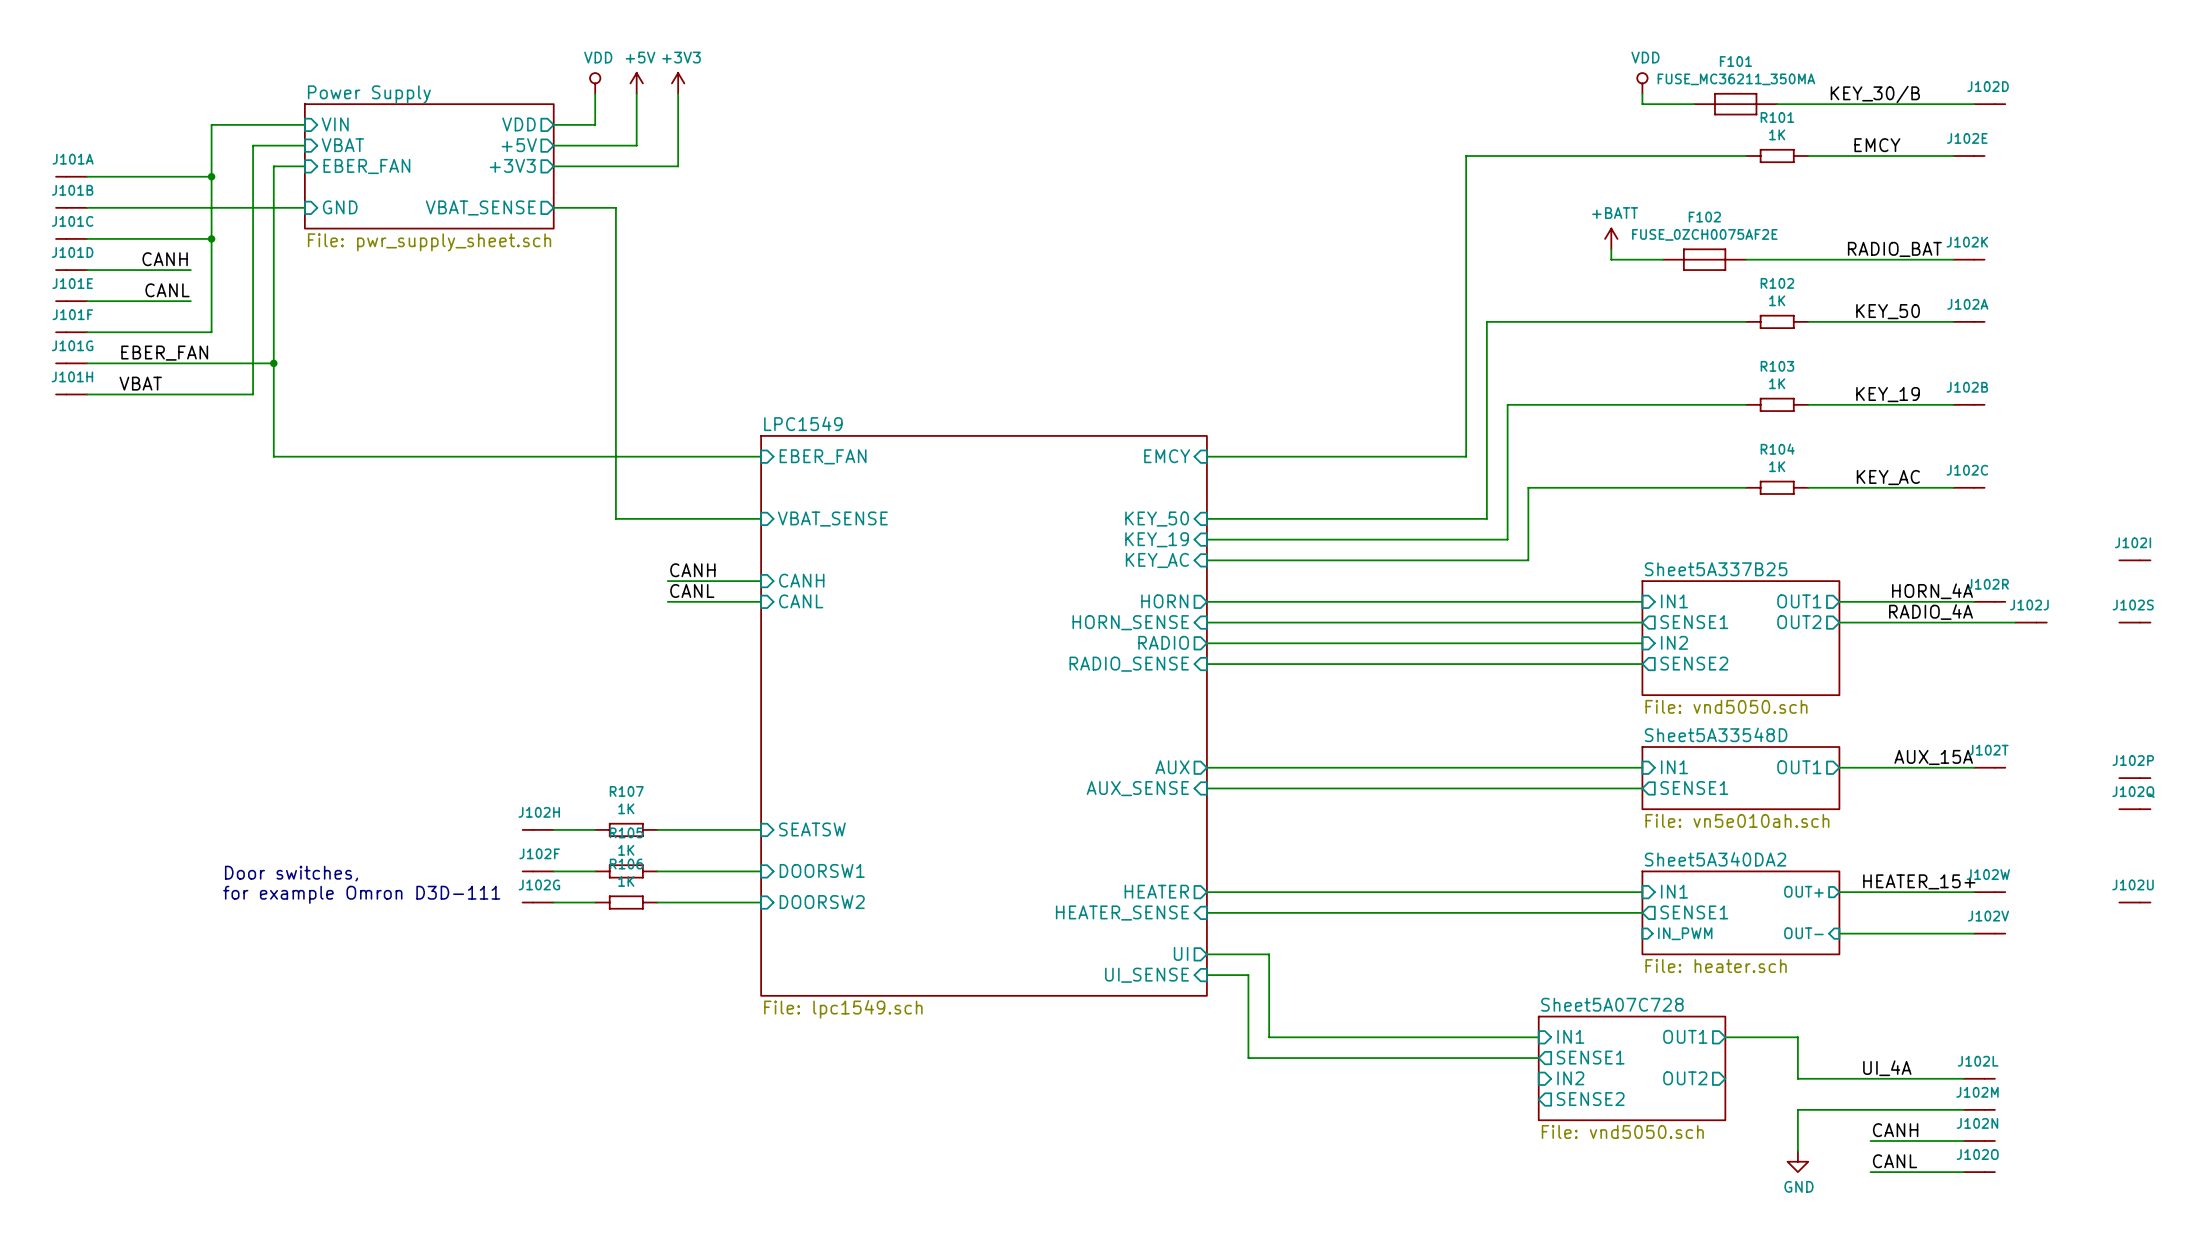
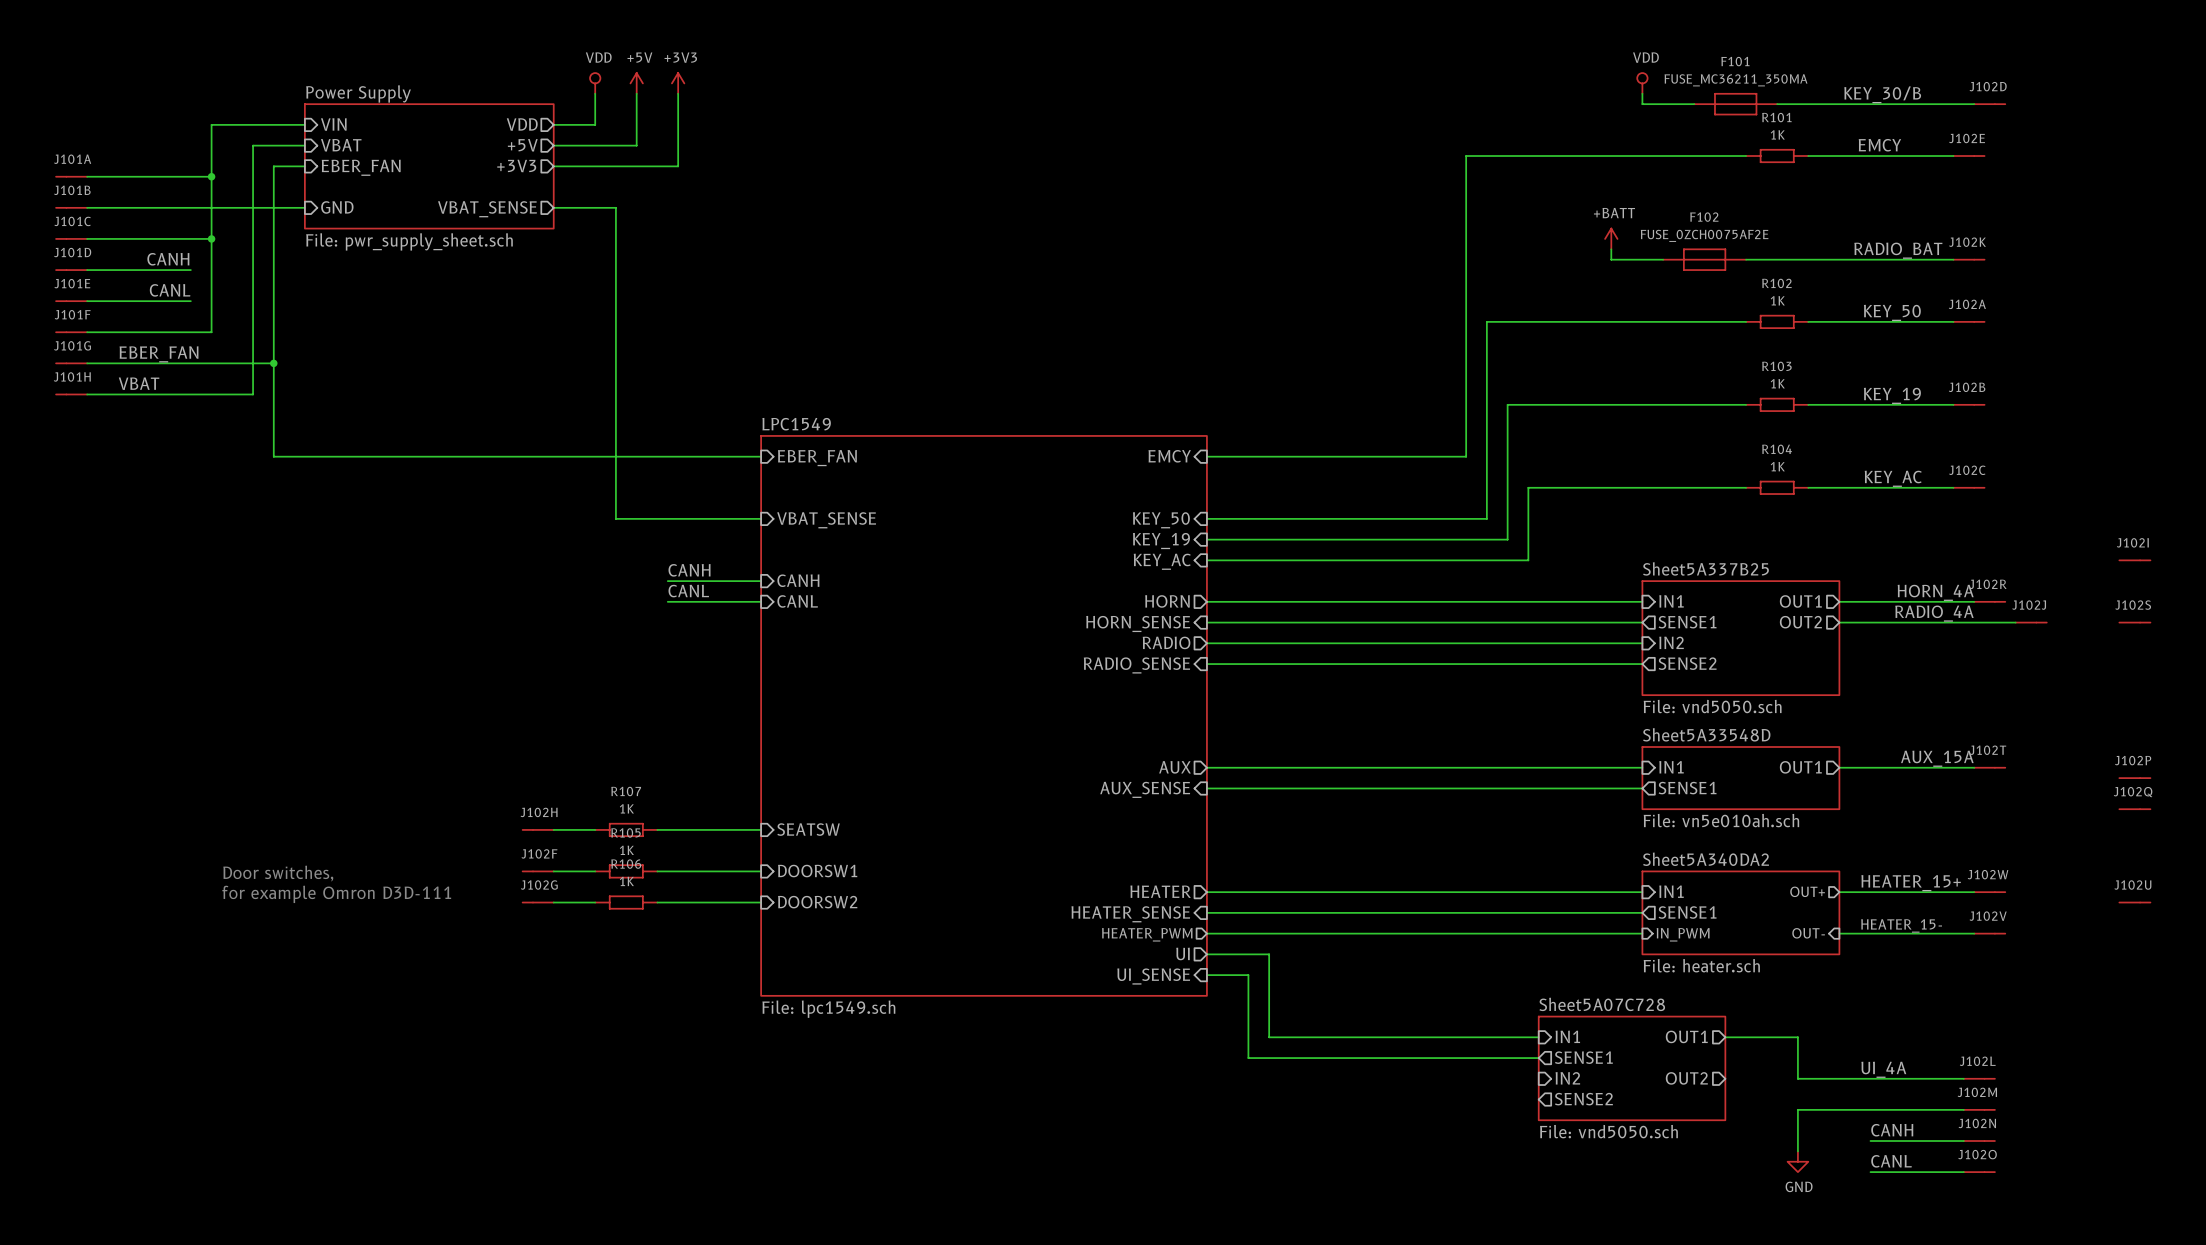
label: none -> HEATER_15- (1901, 925)
sheet pin: none -> HEATER_PWM (1147, 934)
wire: none -> (1206, 933) (1642, 933)

